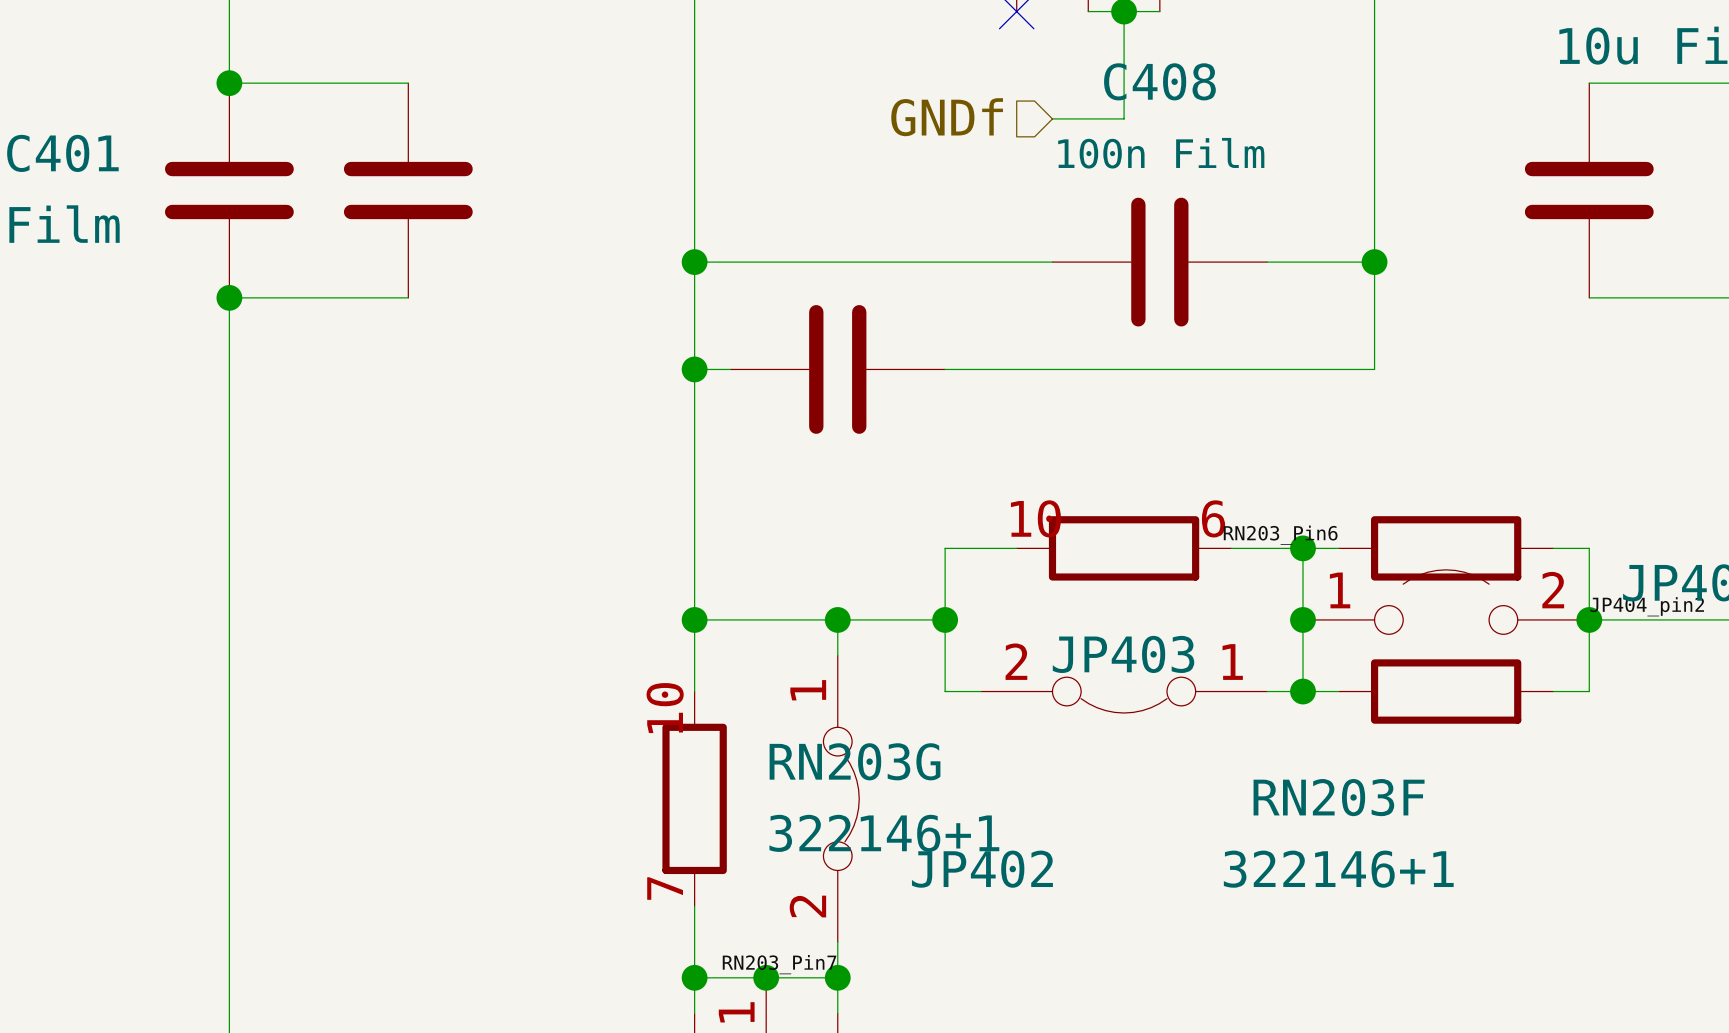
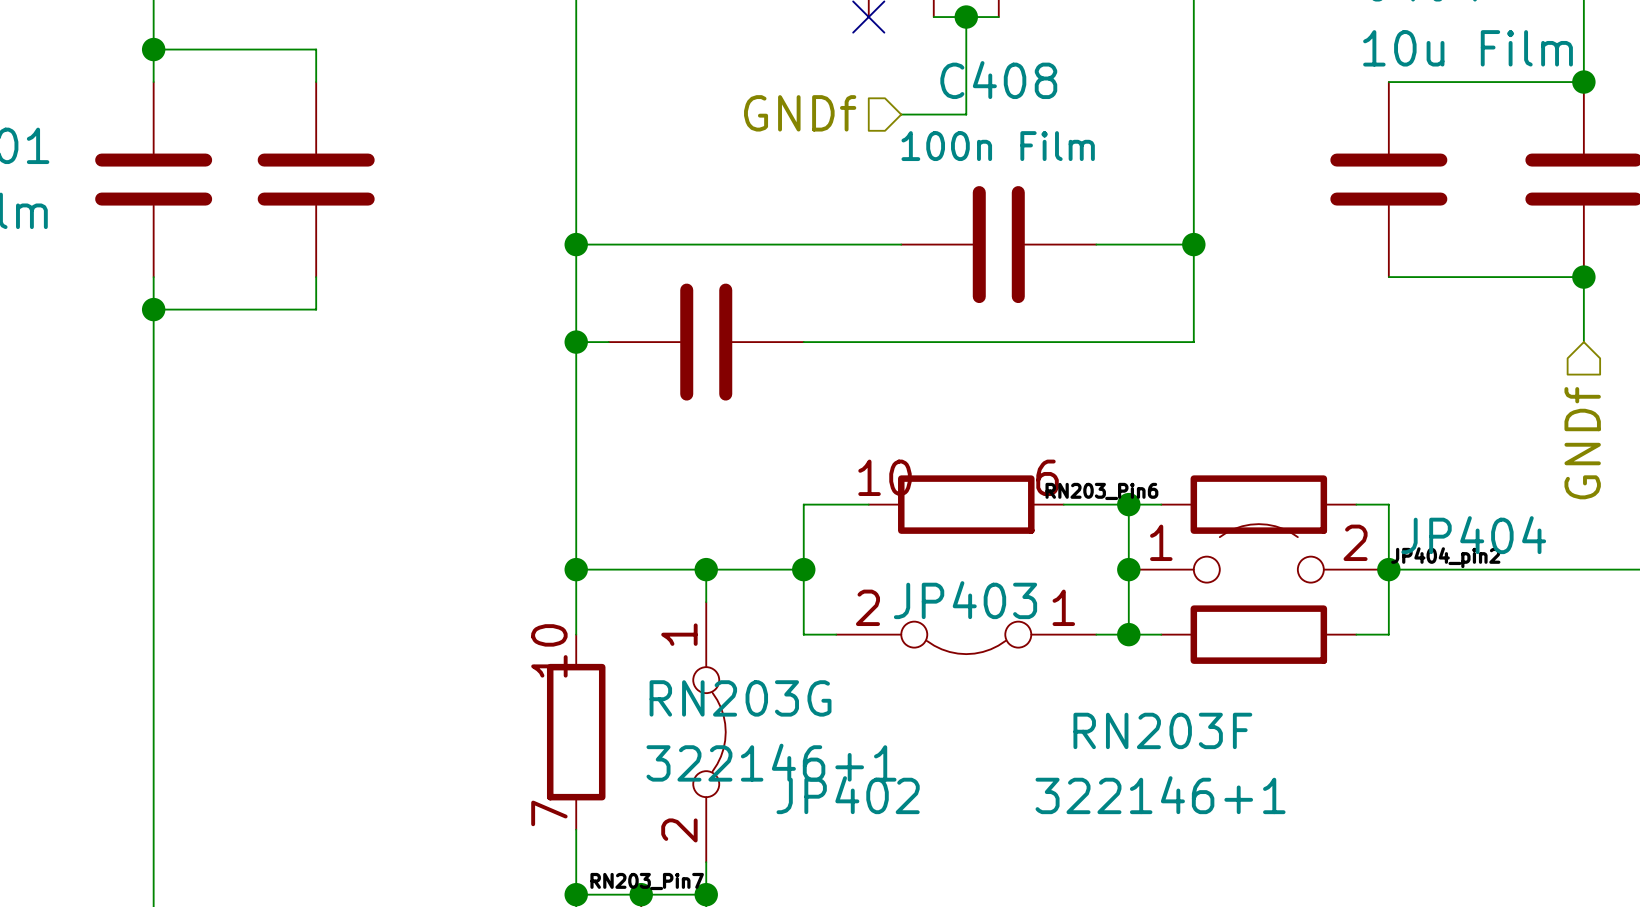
wire: (229, 83) (408, 83) -> (153, 49) (316, 49) (316, 82)
junction position: (229, 83) -> (153, 49)
wire: (229, 297) (408, 297) -> (153, 309) (316, 309) (316, 277)
junction position: (229, 297) -> (153, 309)

